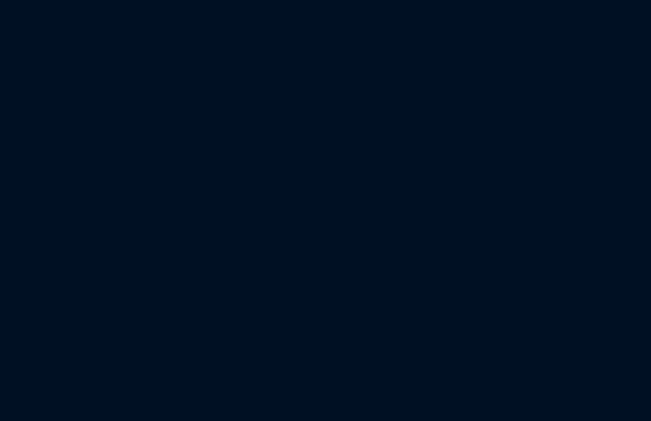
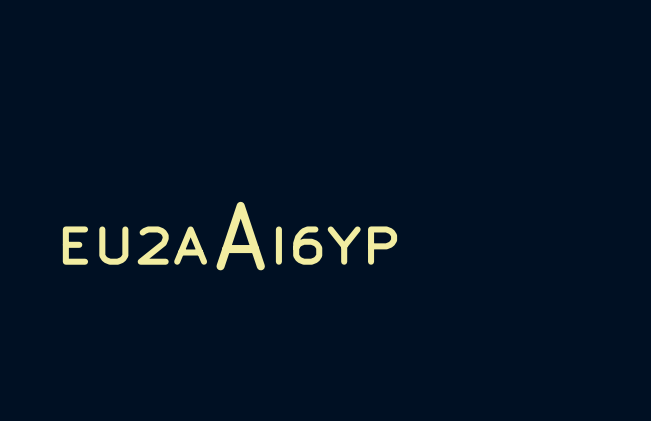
text: none -> A (240, 236)
text: none -> EU2A I6YP (229, 245)

